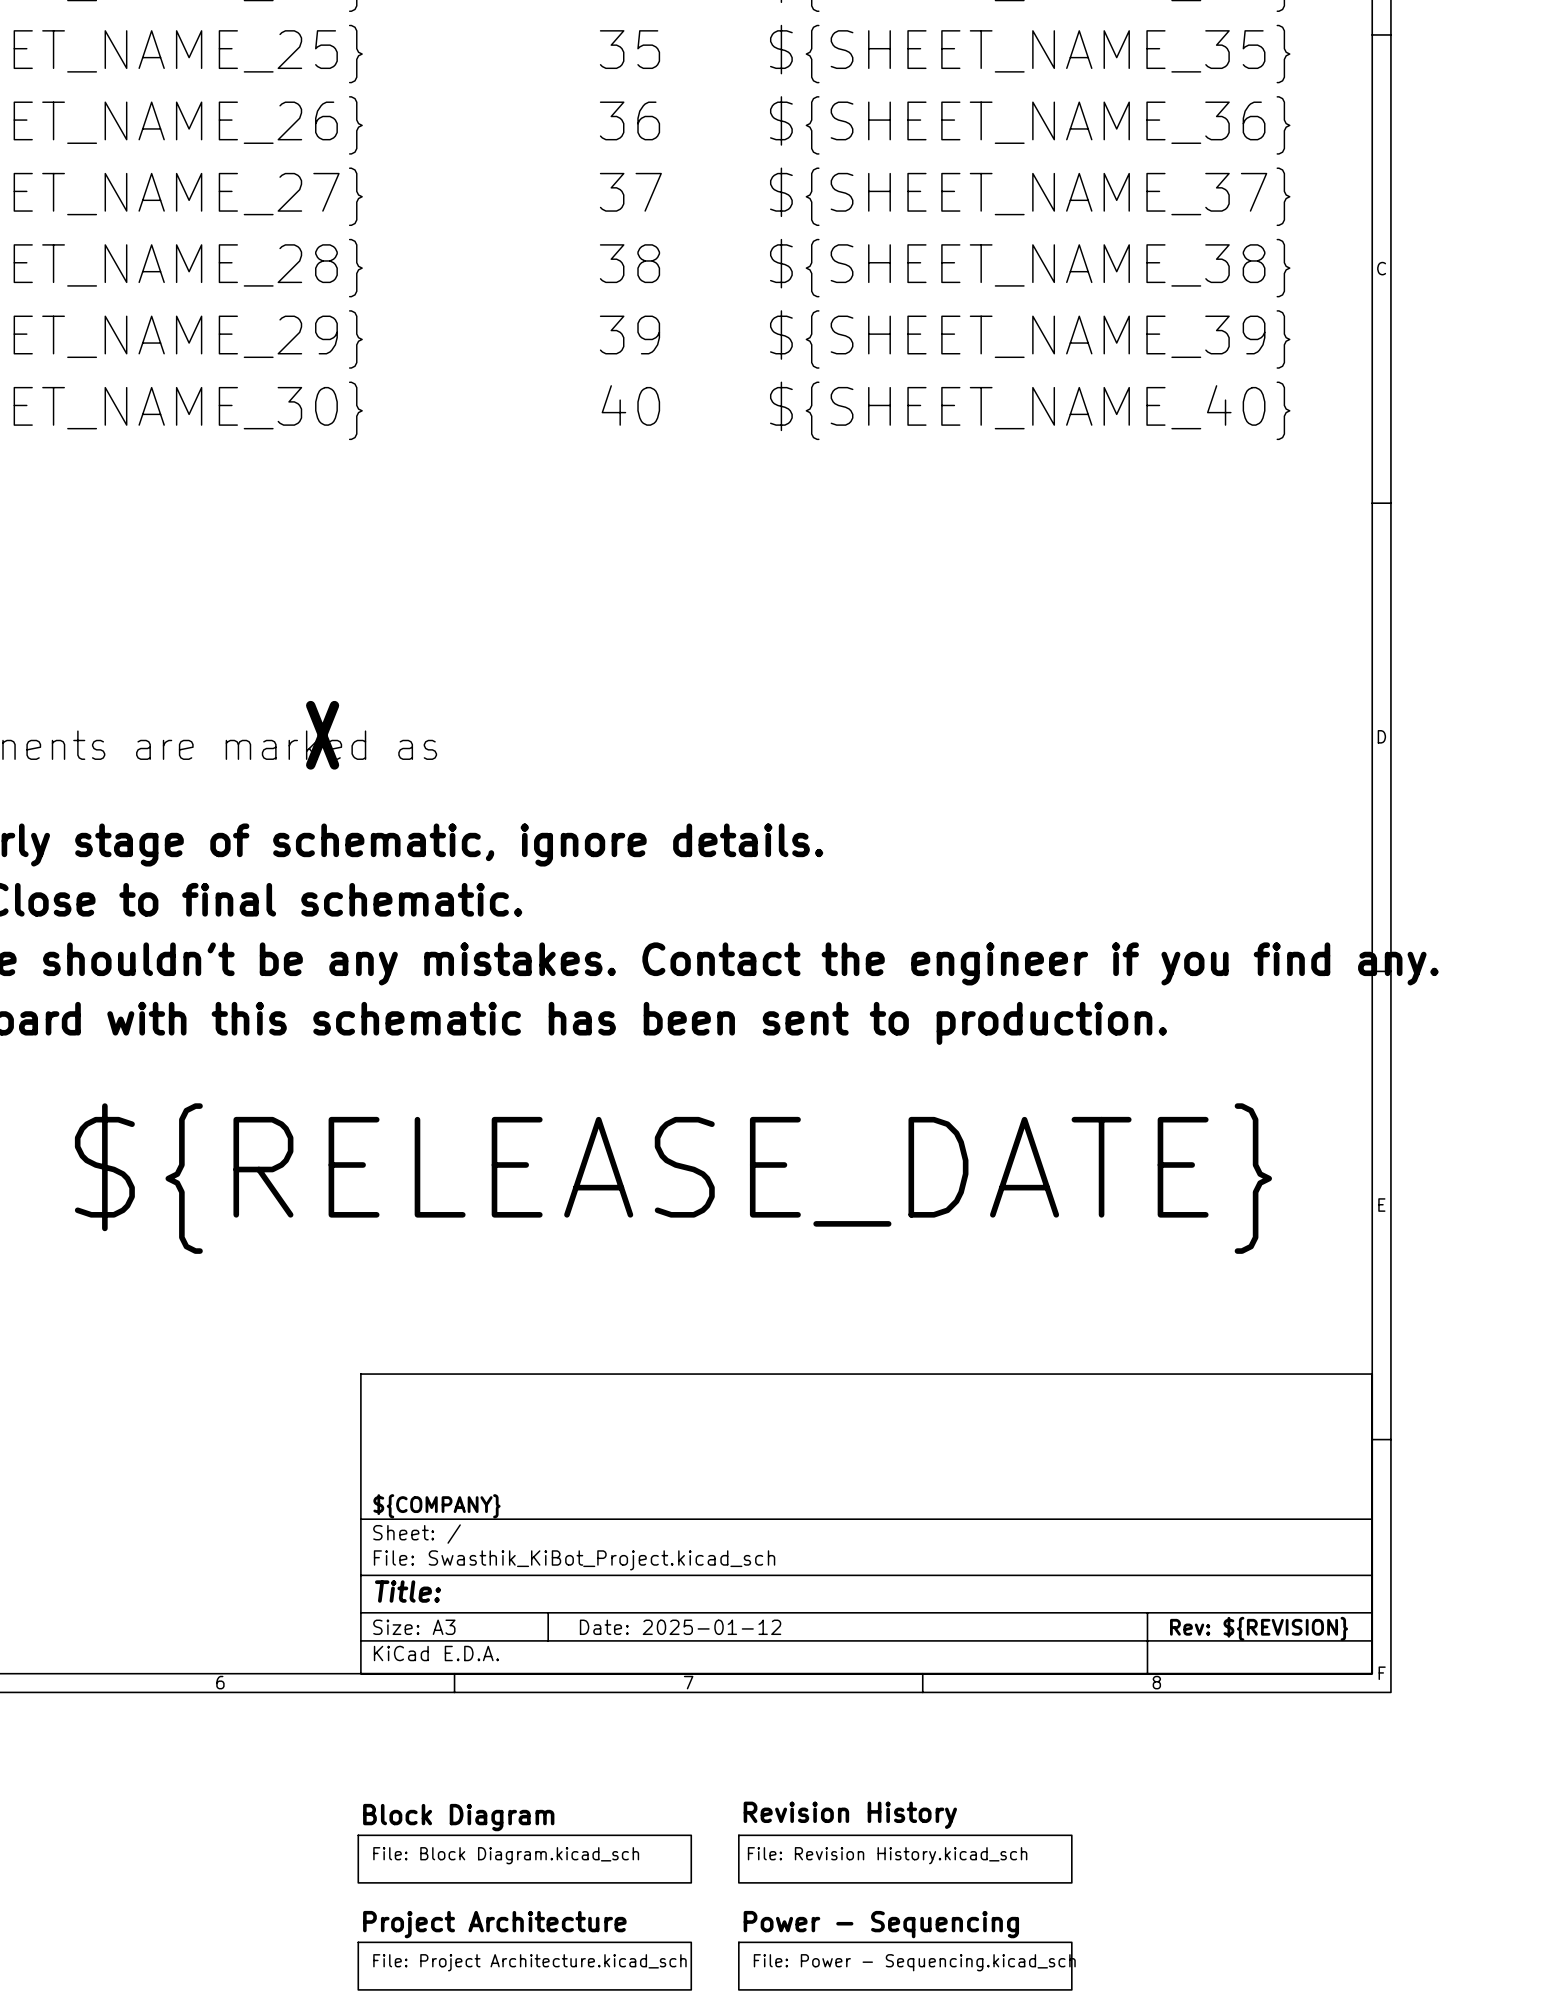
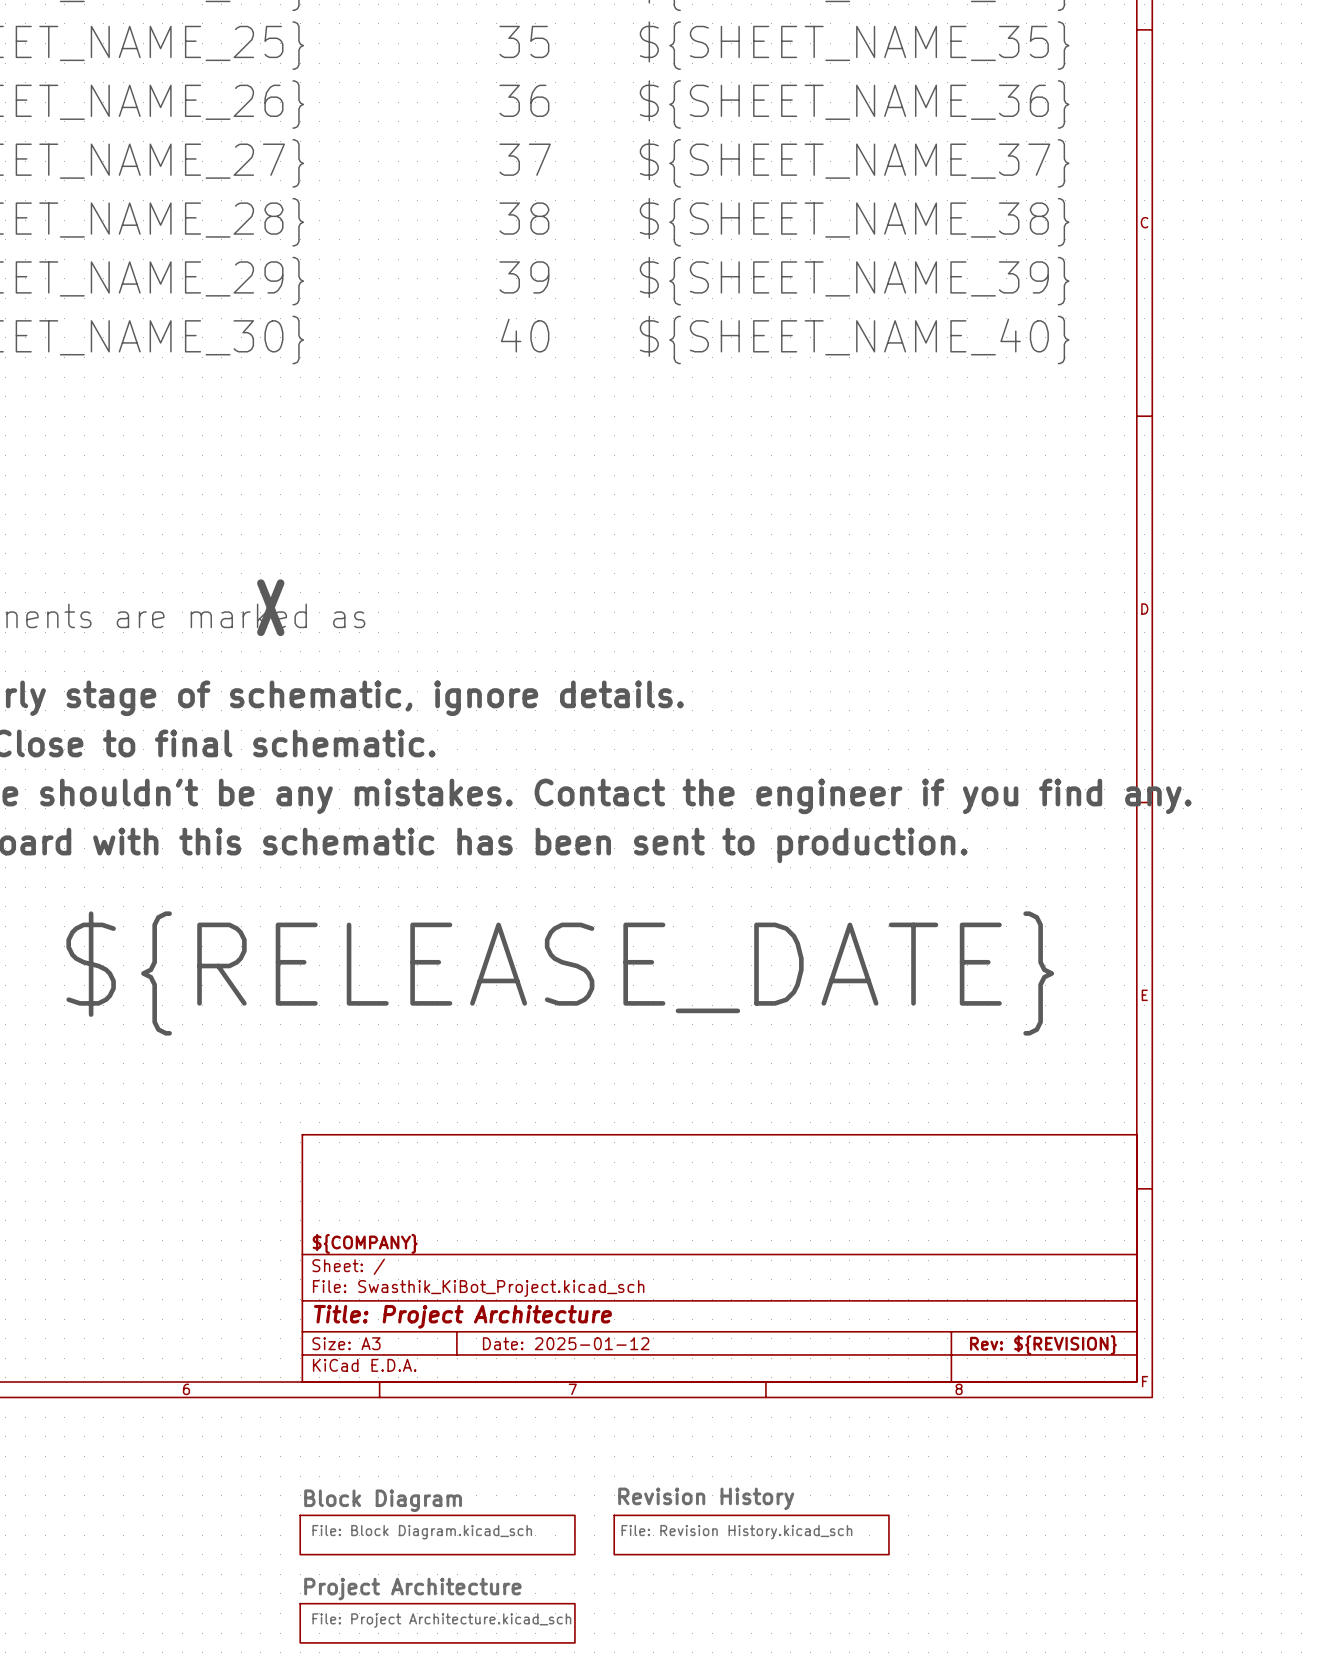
title block: Title: (408, 1591) -> Title: Project Architecture (462, 1316)
sheet Power - Sequencing: File: Power - Sequencing.kicad_sch (905, 1966) -> none

